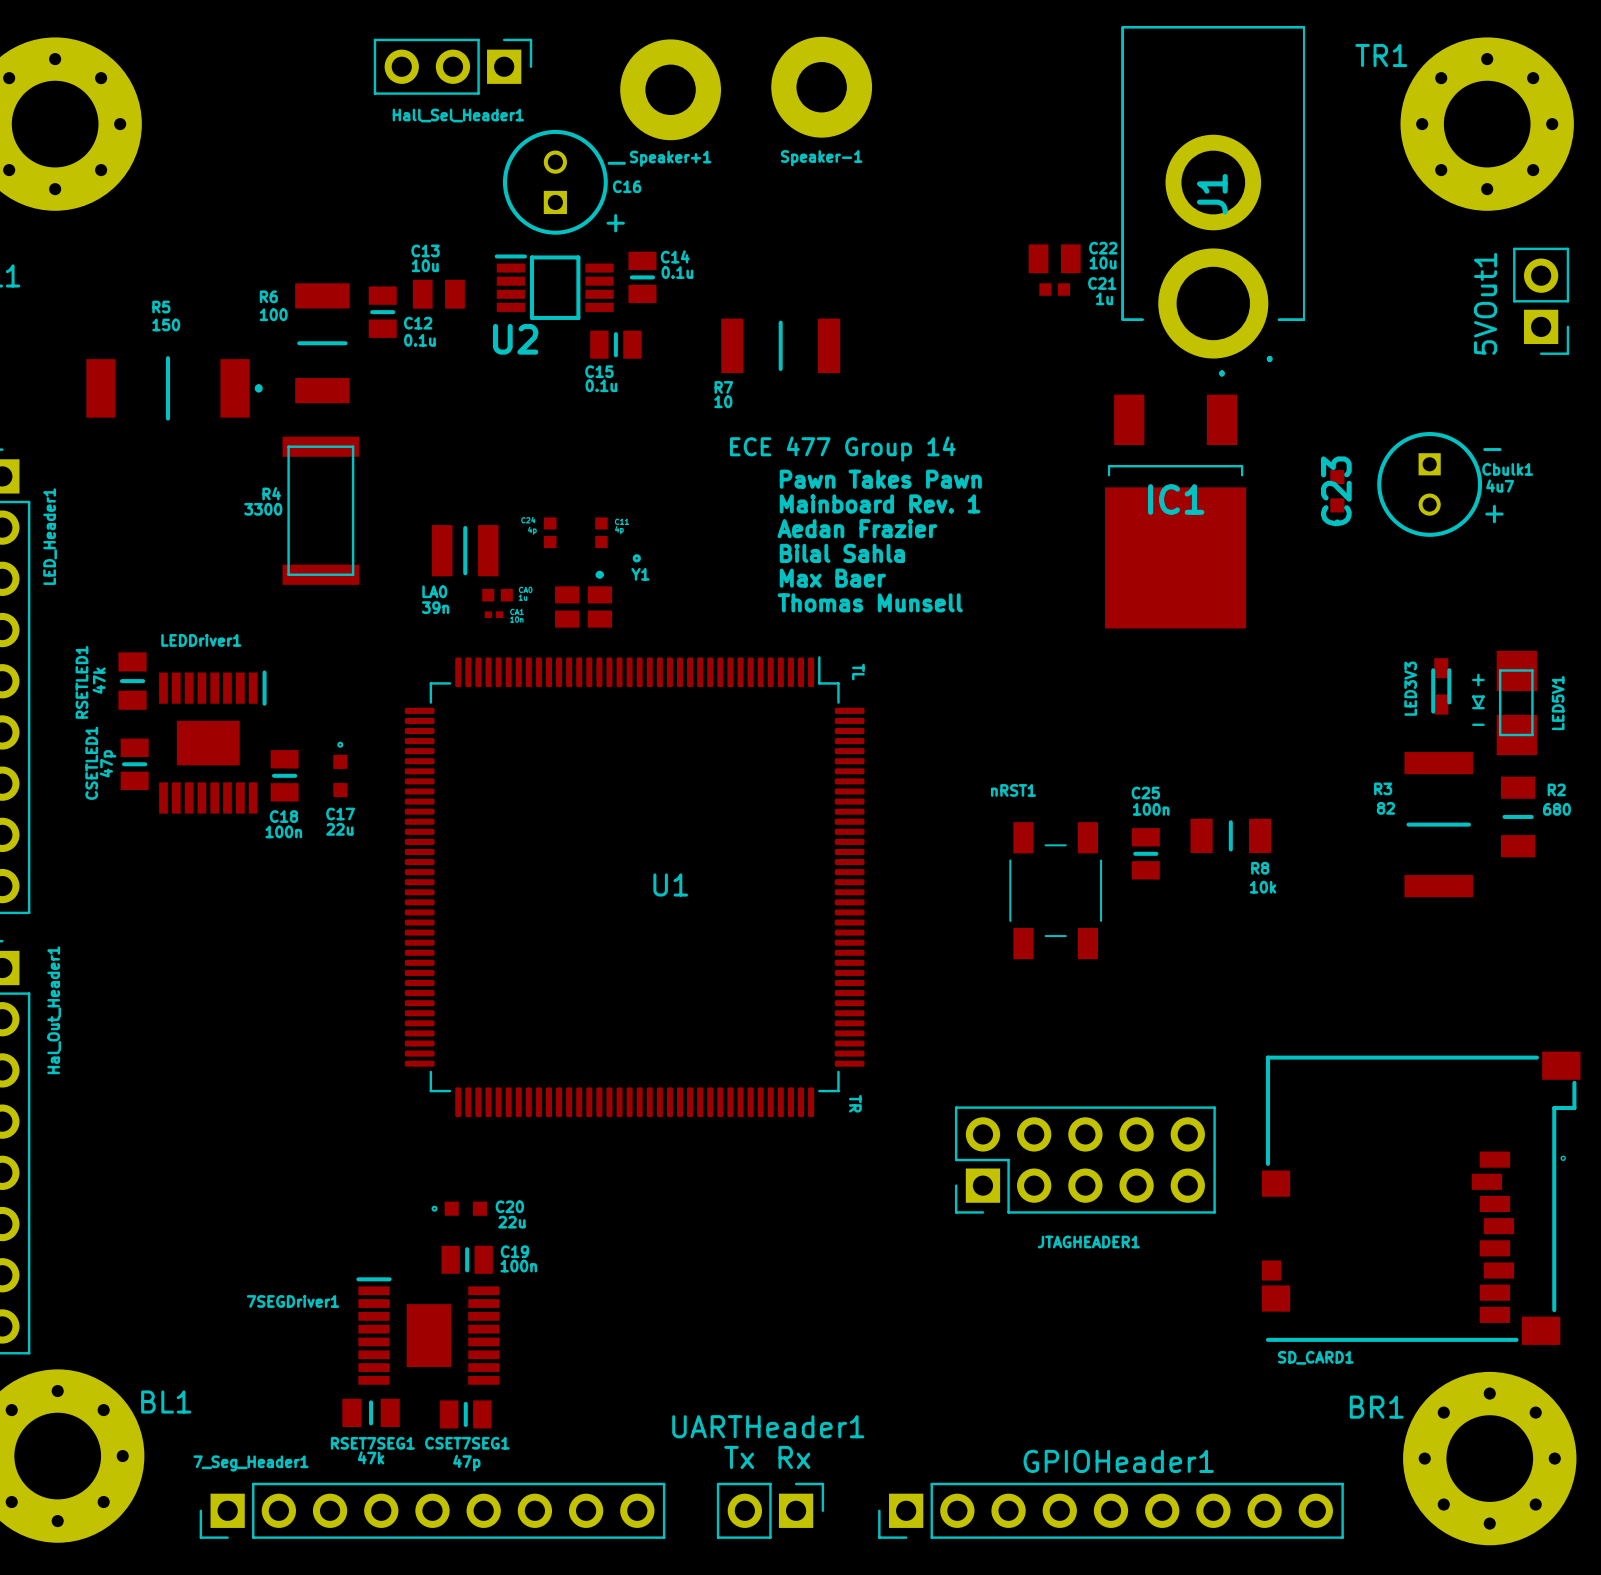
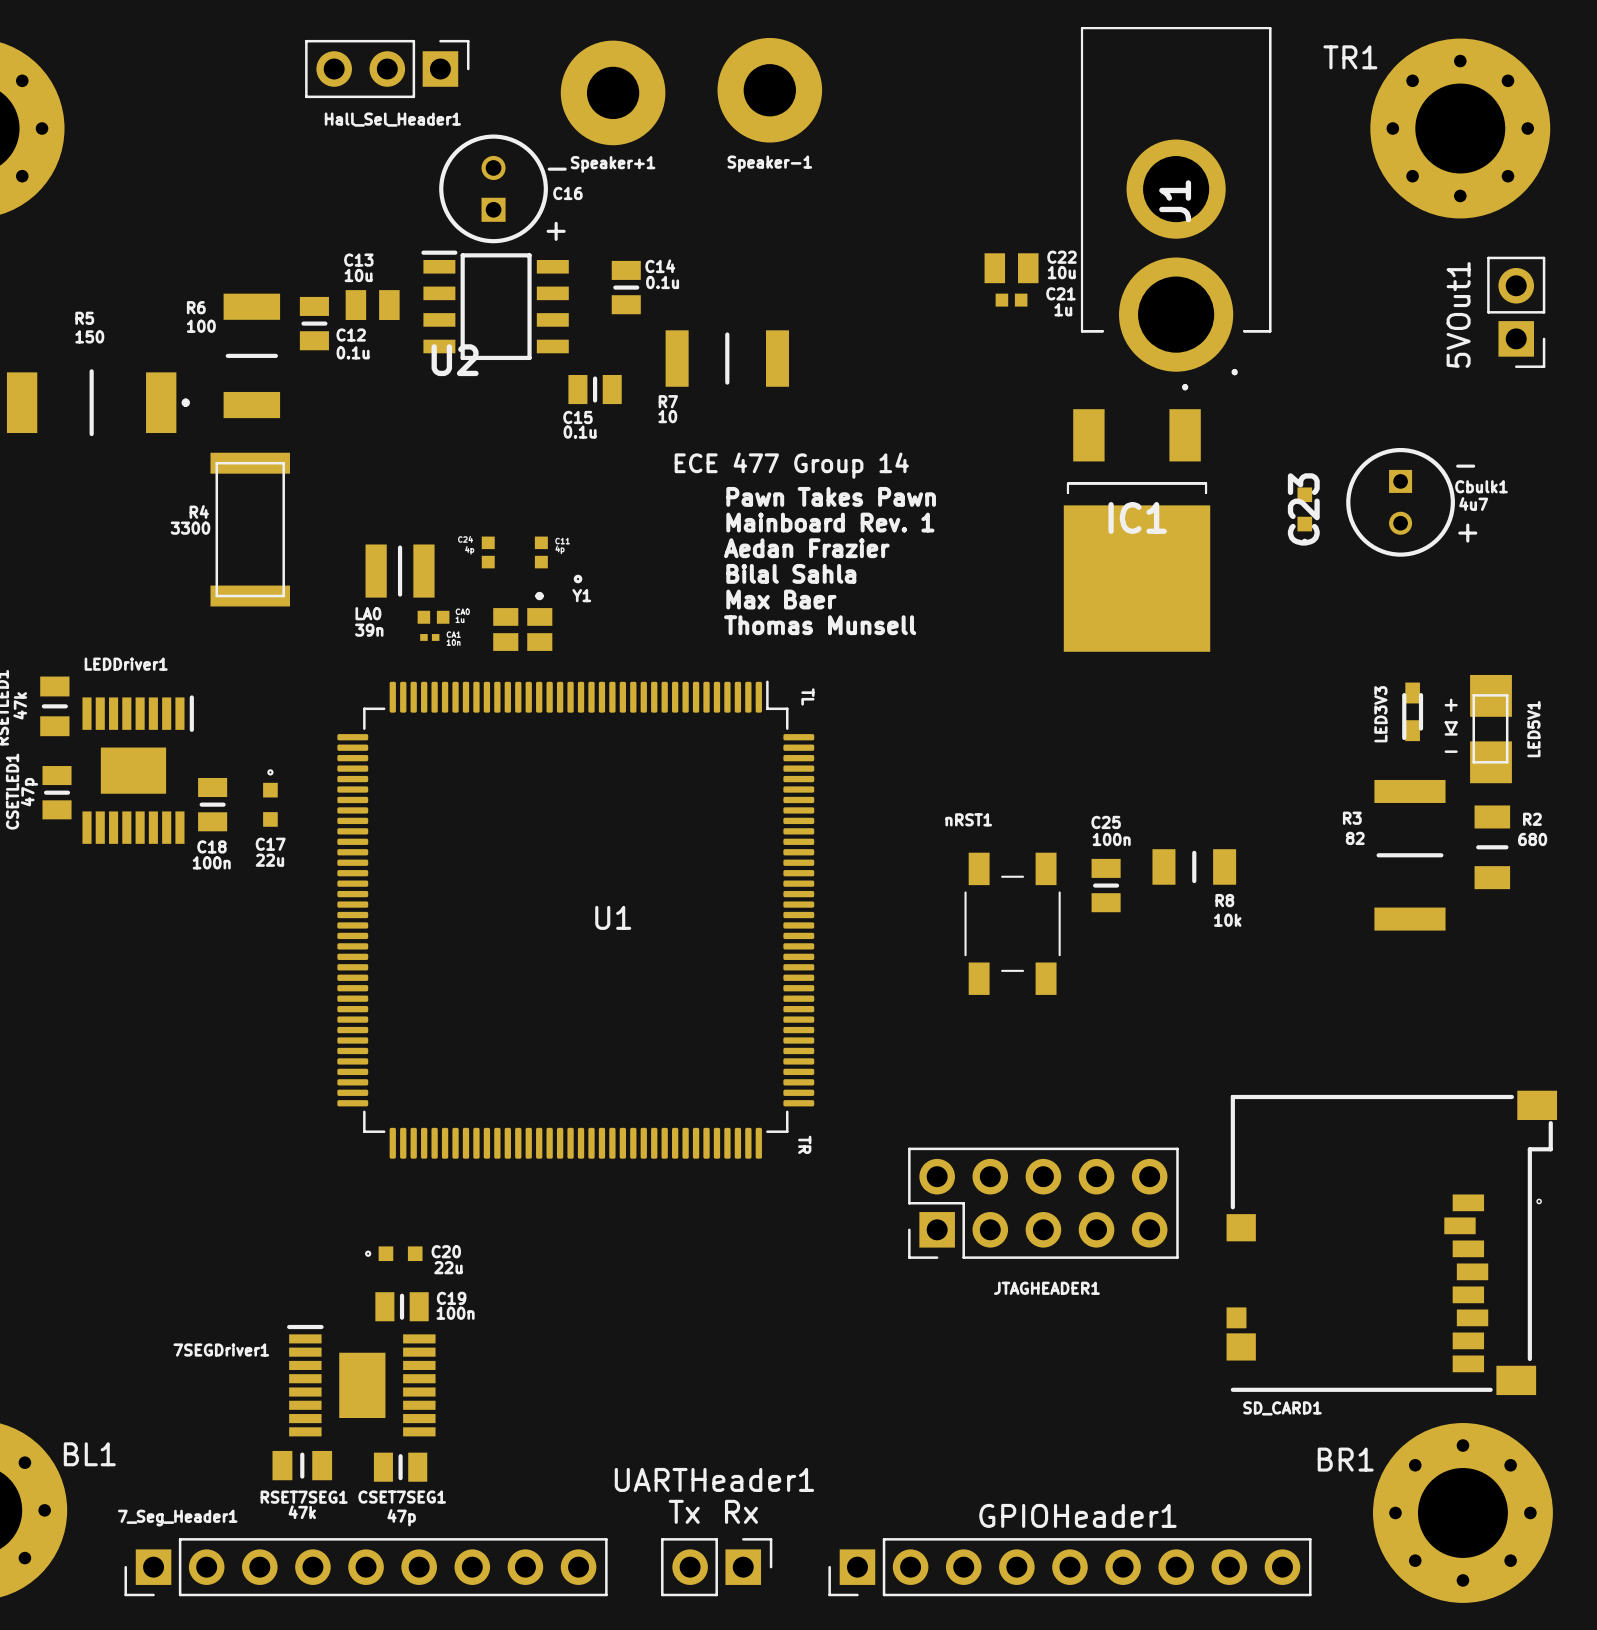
U2 footprint: [494, 254, 614, 320] -> [421, 250, 569, 361]
C14 position: (642, 277) -> (626, 287)
C15 position: (615, 344) -> (595, 389)

